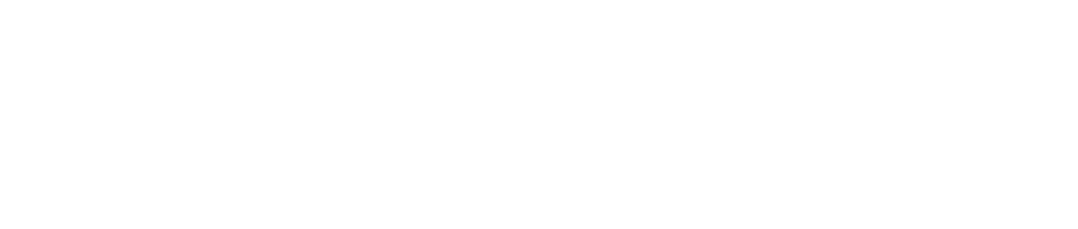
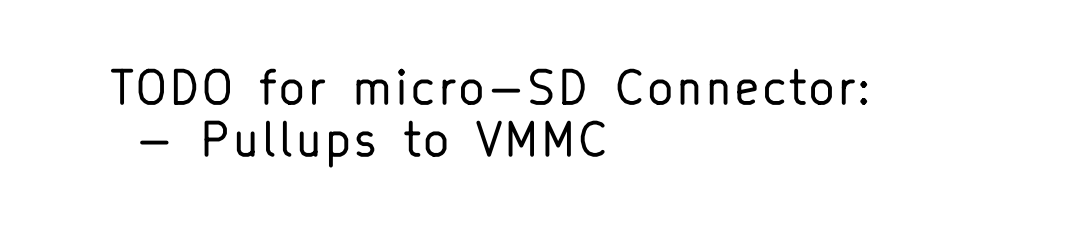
text: none -> TODO for micro-SD Connector: (489, 86)
text: none -> - Pullups to VMMC (372, 144)

